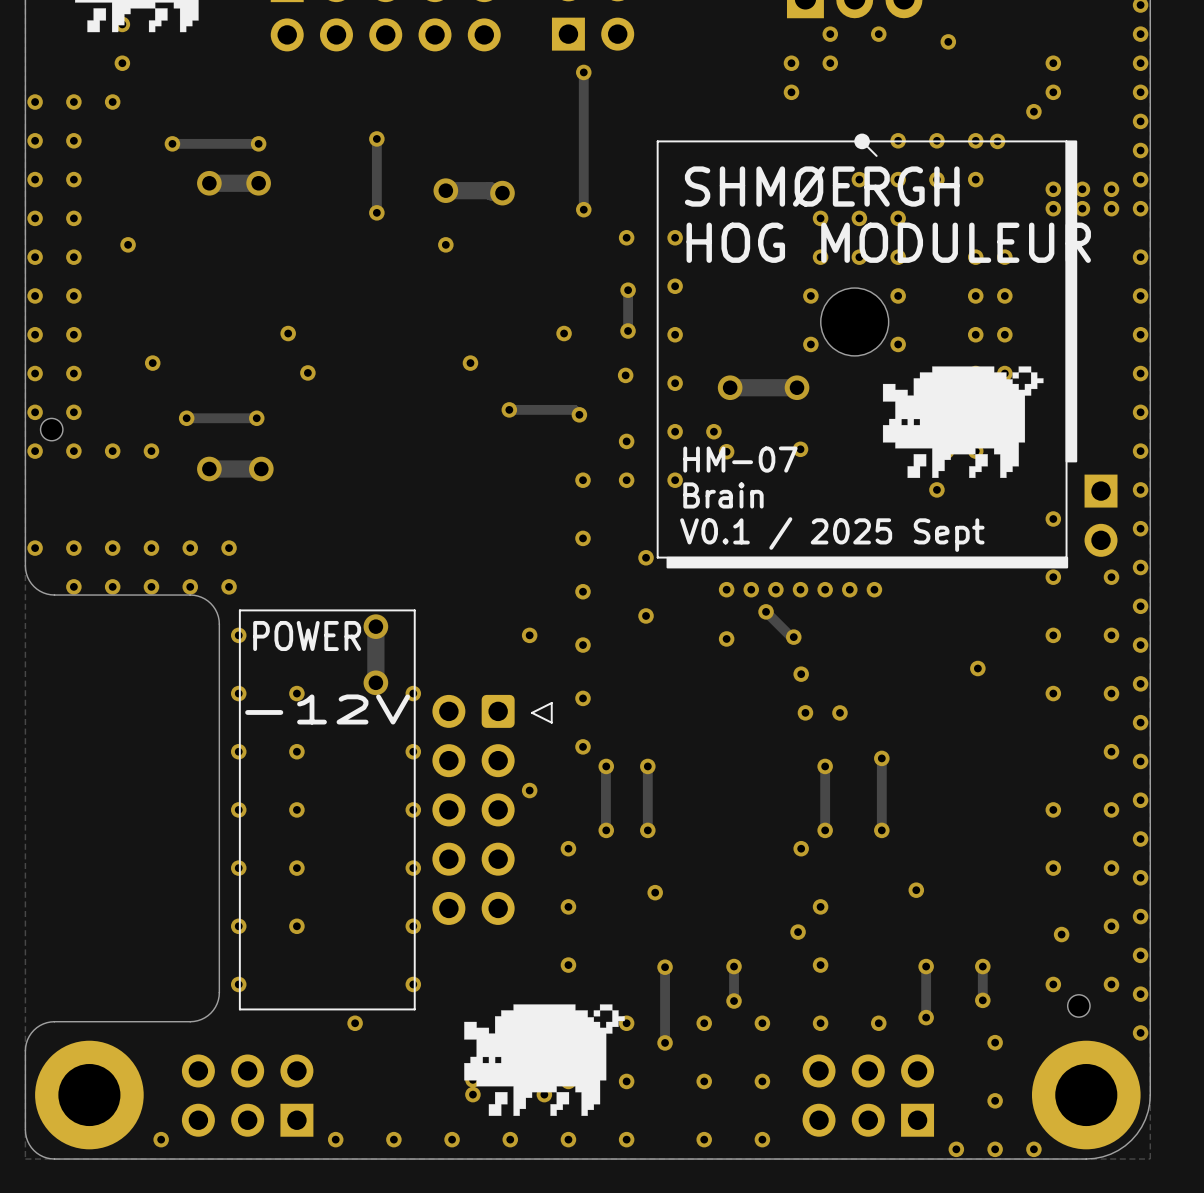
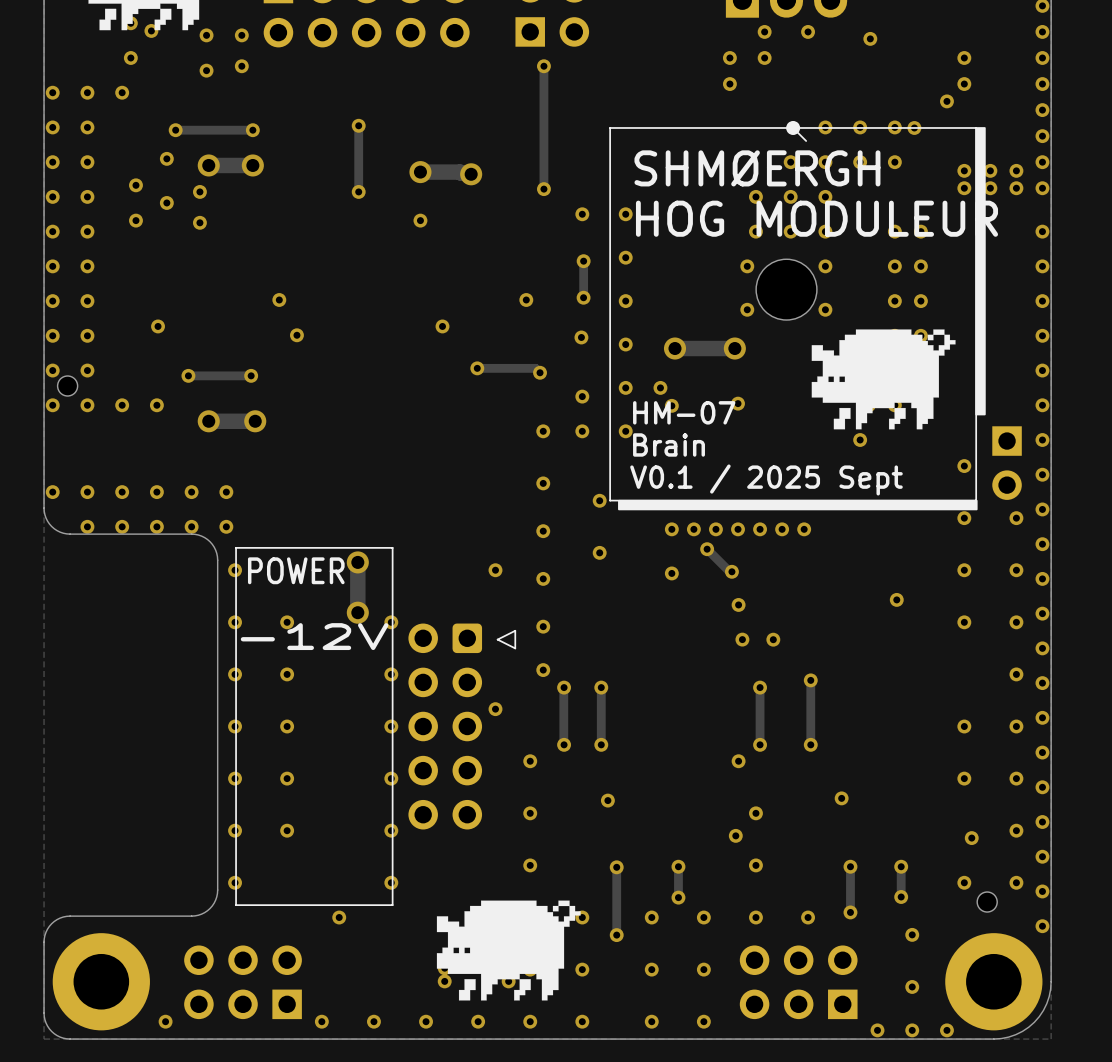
via: none -> (151, 30)
via: none -> (206, 35)
via: none -> (241, 35)
via: none -> (241, 66)
via: none -> (206, 70)
via: none -> (166, 158)
via: none -> (135, 185)
via: none -> (199, 191)
via: none -> (166, 202)
via: none -> (199, 222)

